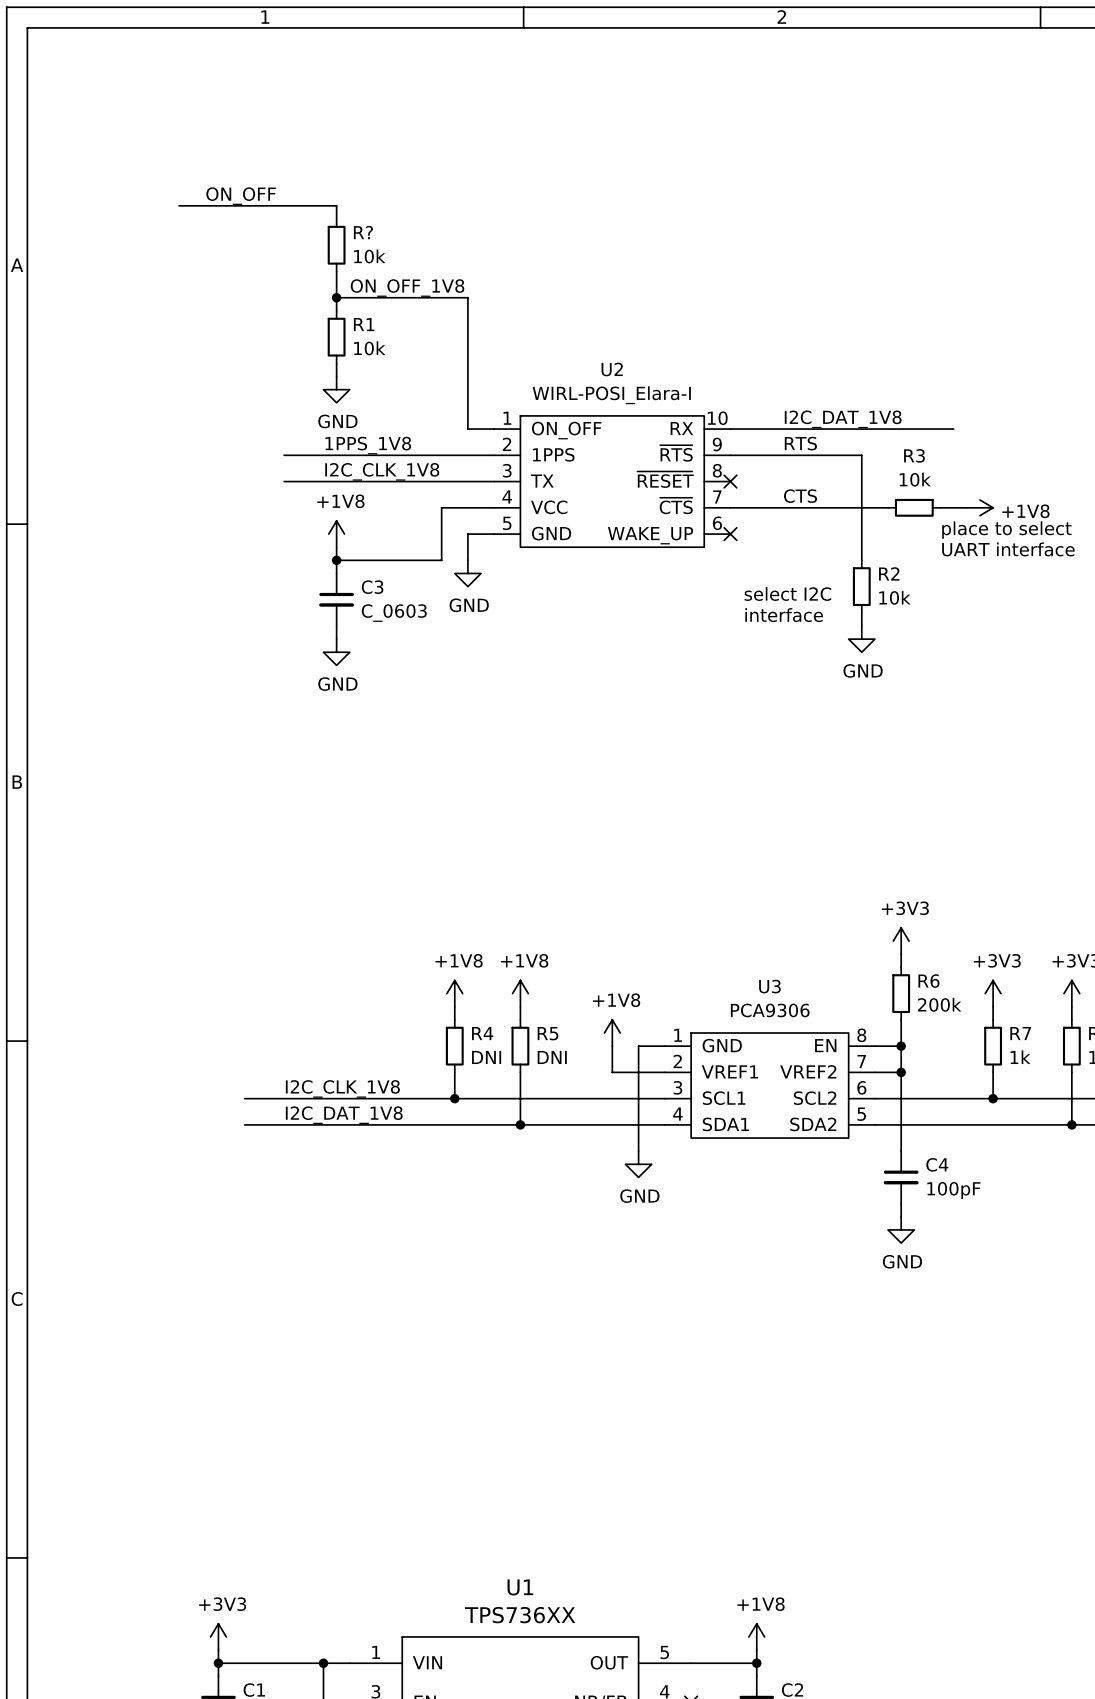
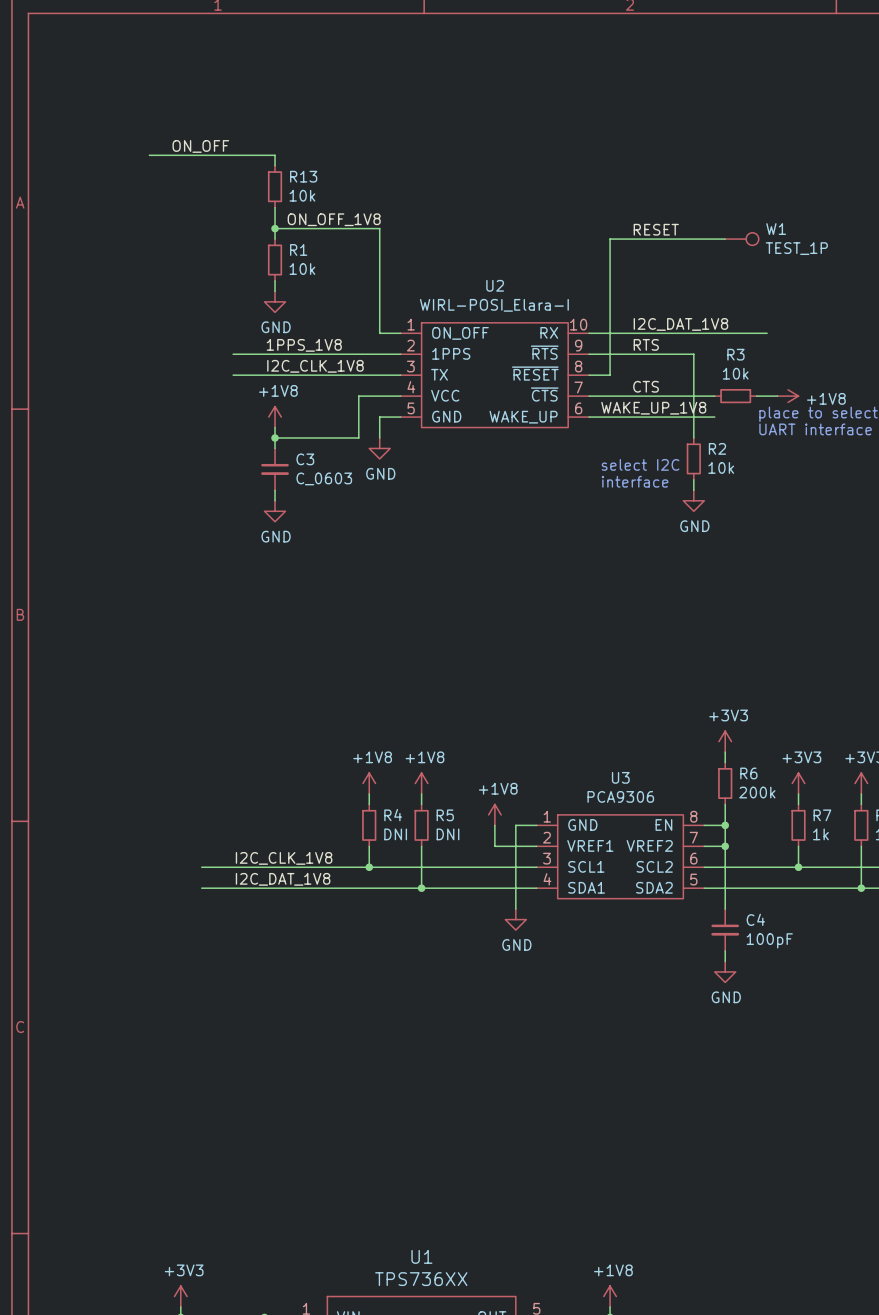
R? name: R? (363, 232) -> R13 (303, 176)
label: none -> RESET (656, 229)
wire: none -> (725, 239) (610, 239) (610, 375) (589, 375)
W1: none -> TEST_1P (741, 239)
no-connect mark: (730, 481) -> none
label: none -> WAKE_UP_1V8 (653, 408)
wire: none -> (589, 417) (714, 417)
no-connect mark: (730, 534) -> none

